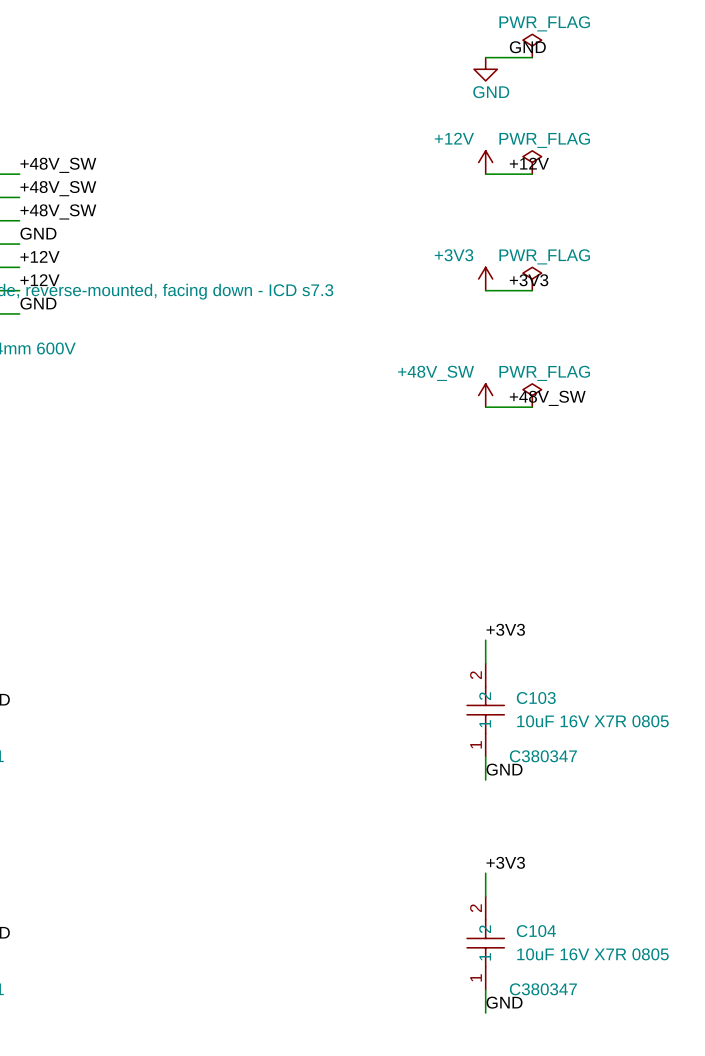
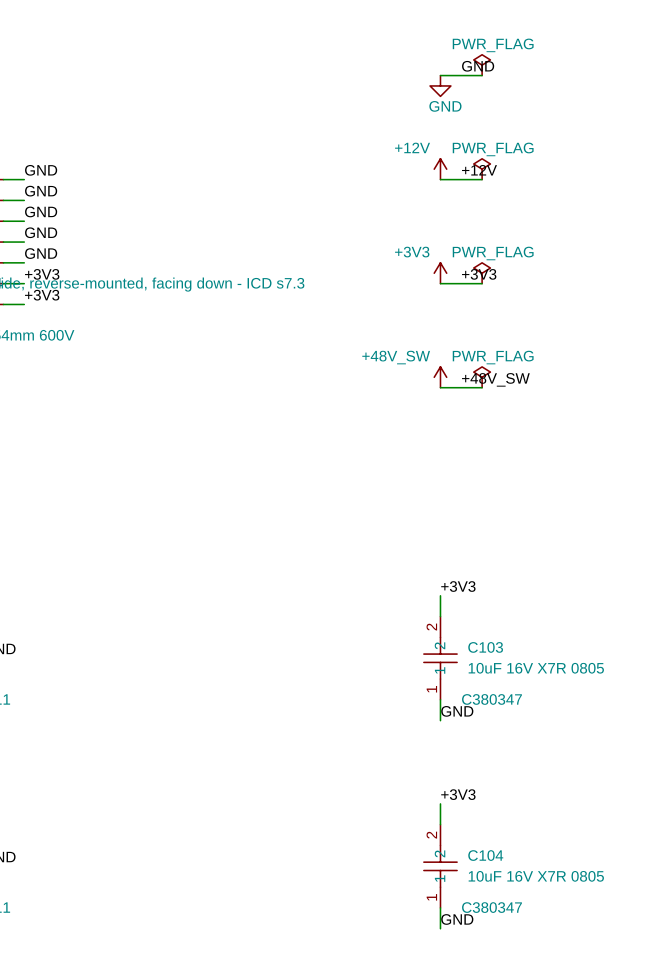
label: +48V_SW (58, 165) -> GND (41, 170)
label: +48V_SW (58, 188) -> GND (41, 191)
label: +48V_SW (58, 211) -> GND (41, 211)
label: +12V (40, 256) -> GND (41, 253)
label: +12V (40, 280) -> +3V3 (42, 274)
label: GND (38, 303) -> +3V3 (42, 295)

